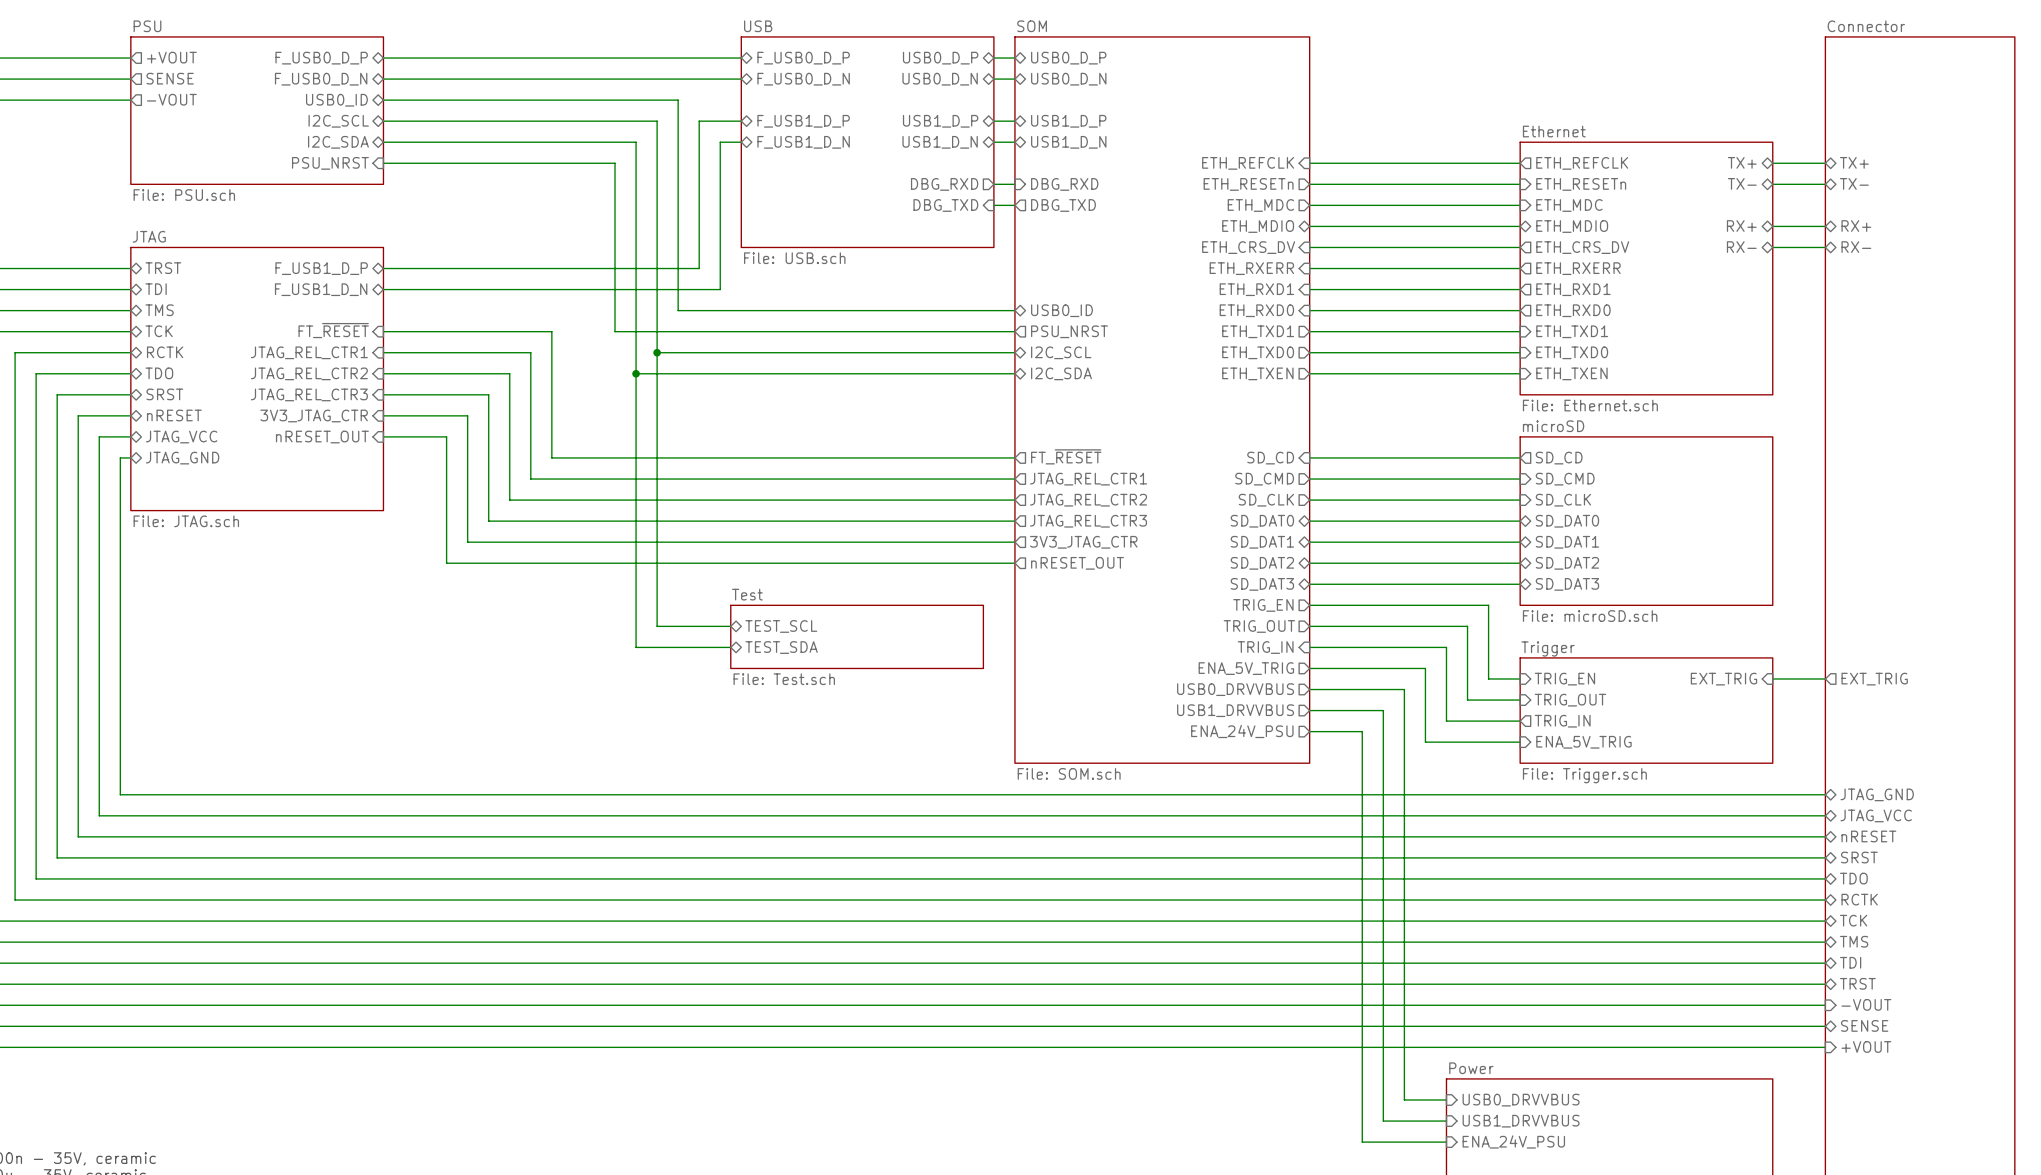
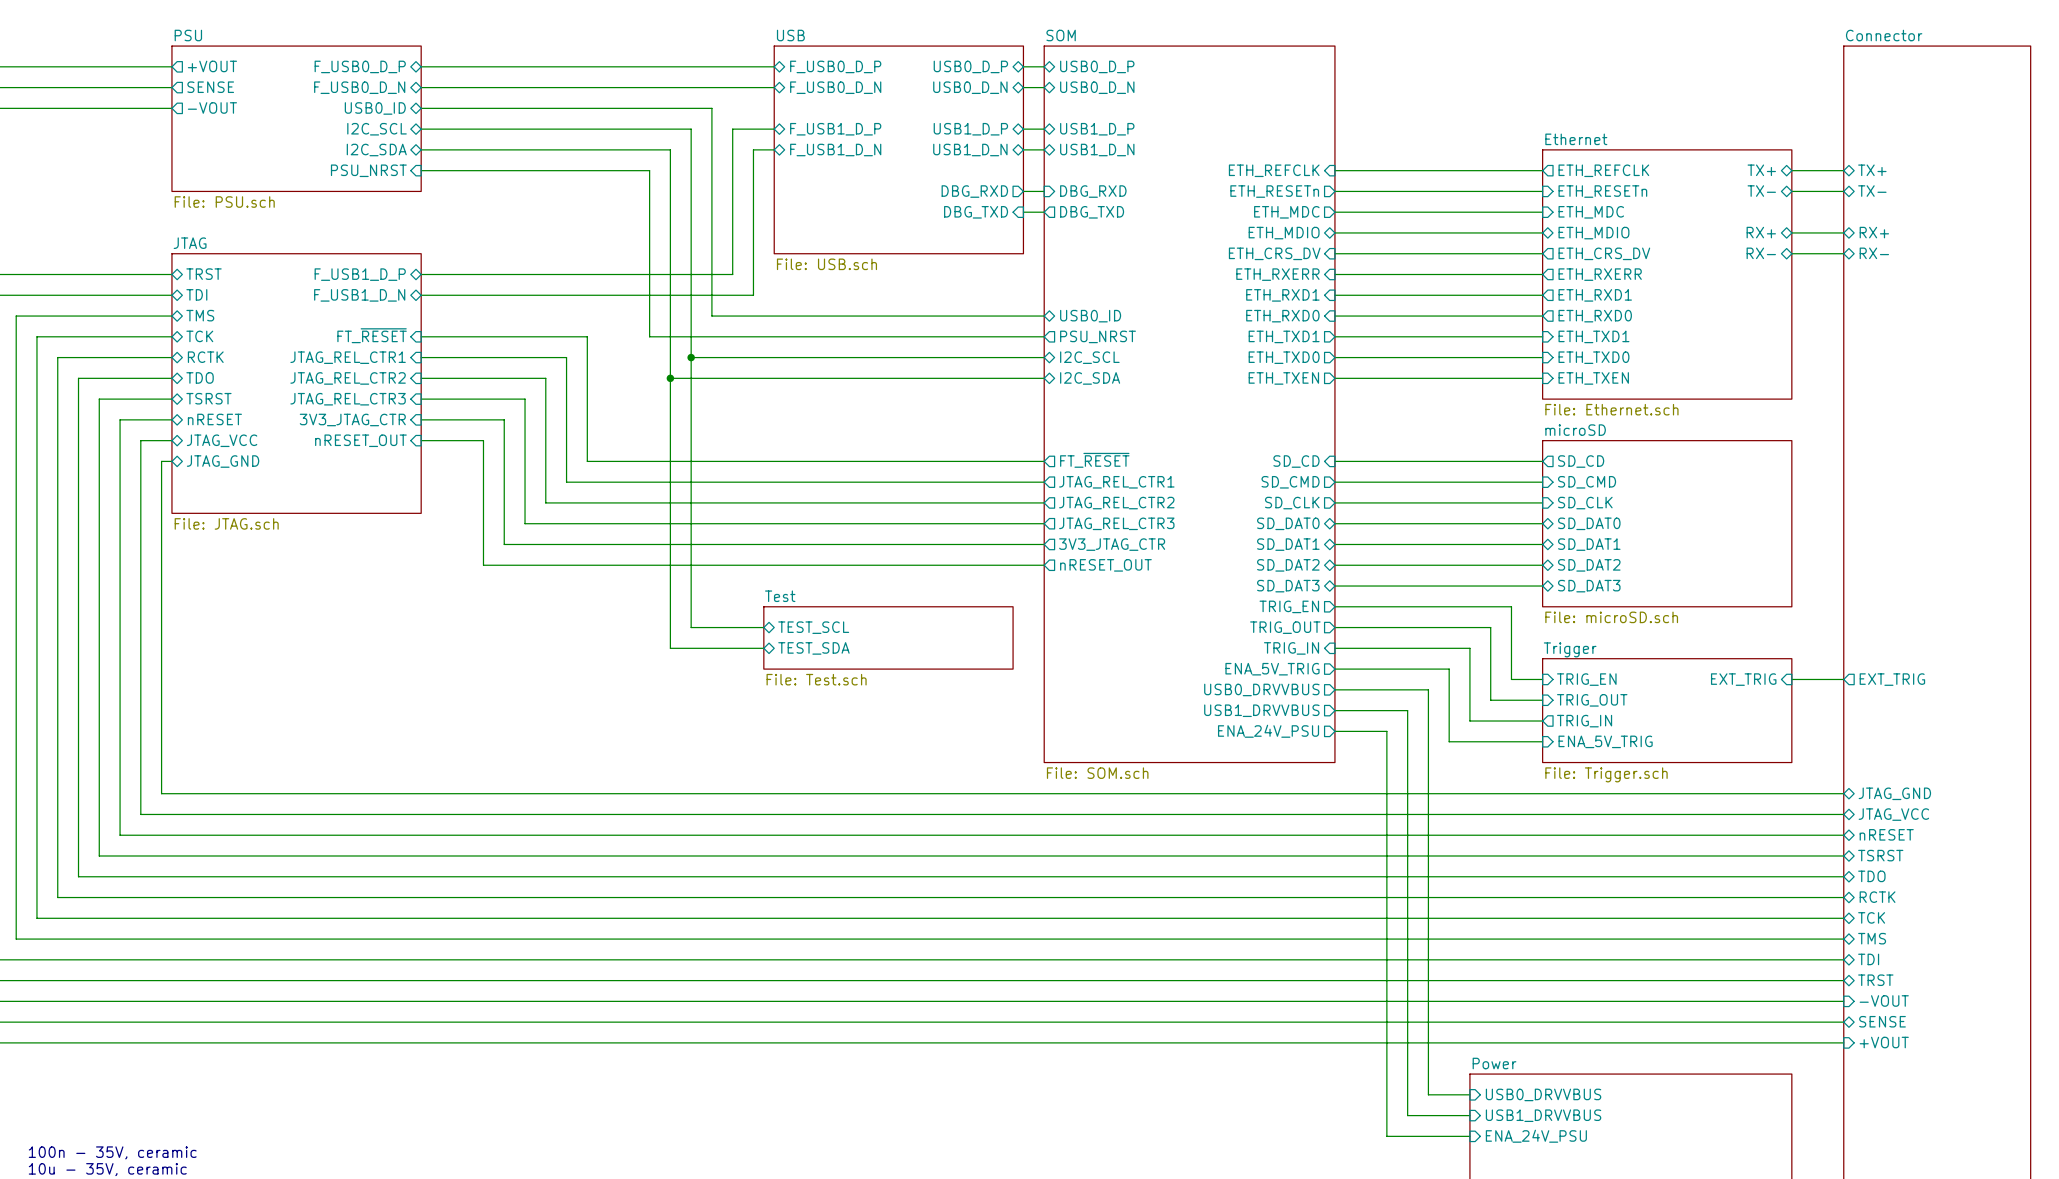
sheet pin: SRST (164, 394) -> TSRST (208, 398)
sheet pin: SRST (1859, 857) -> TSRST (1880, 855)

